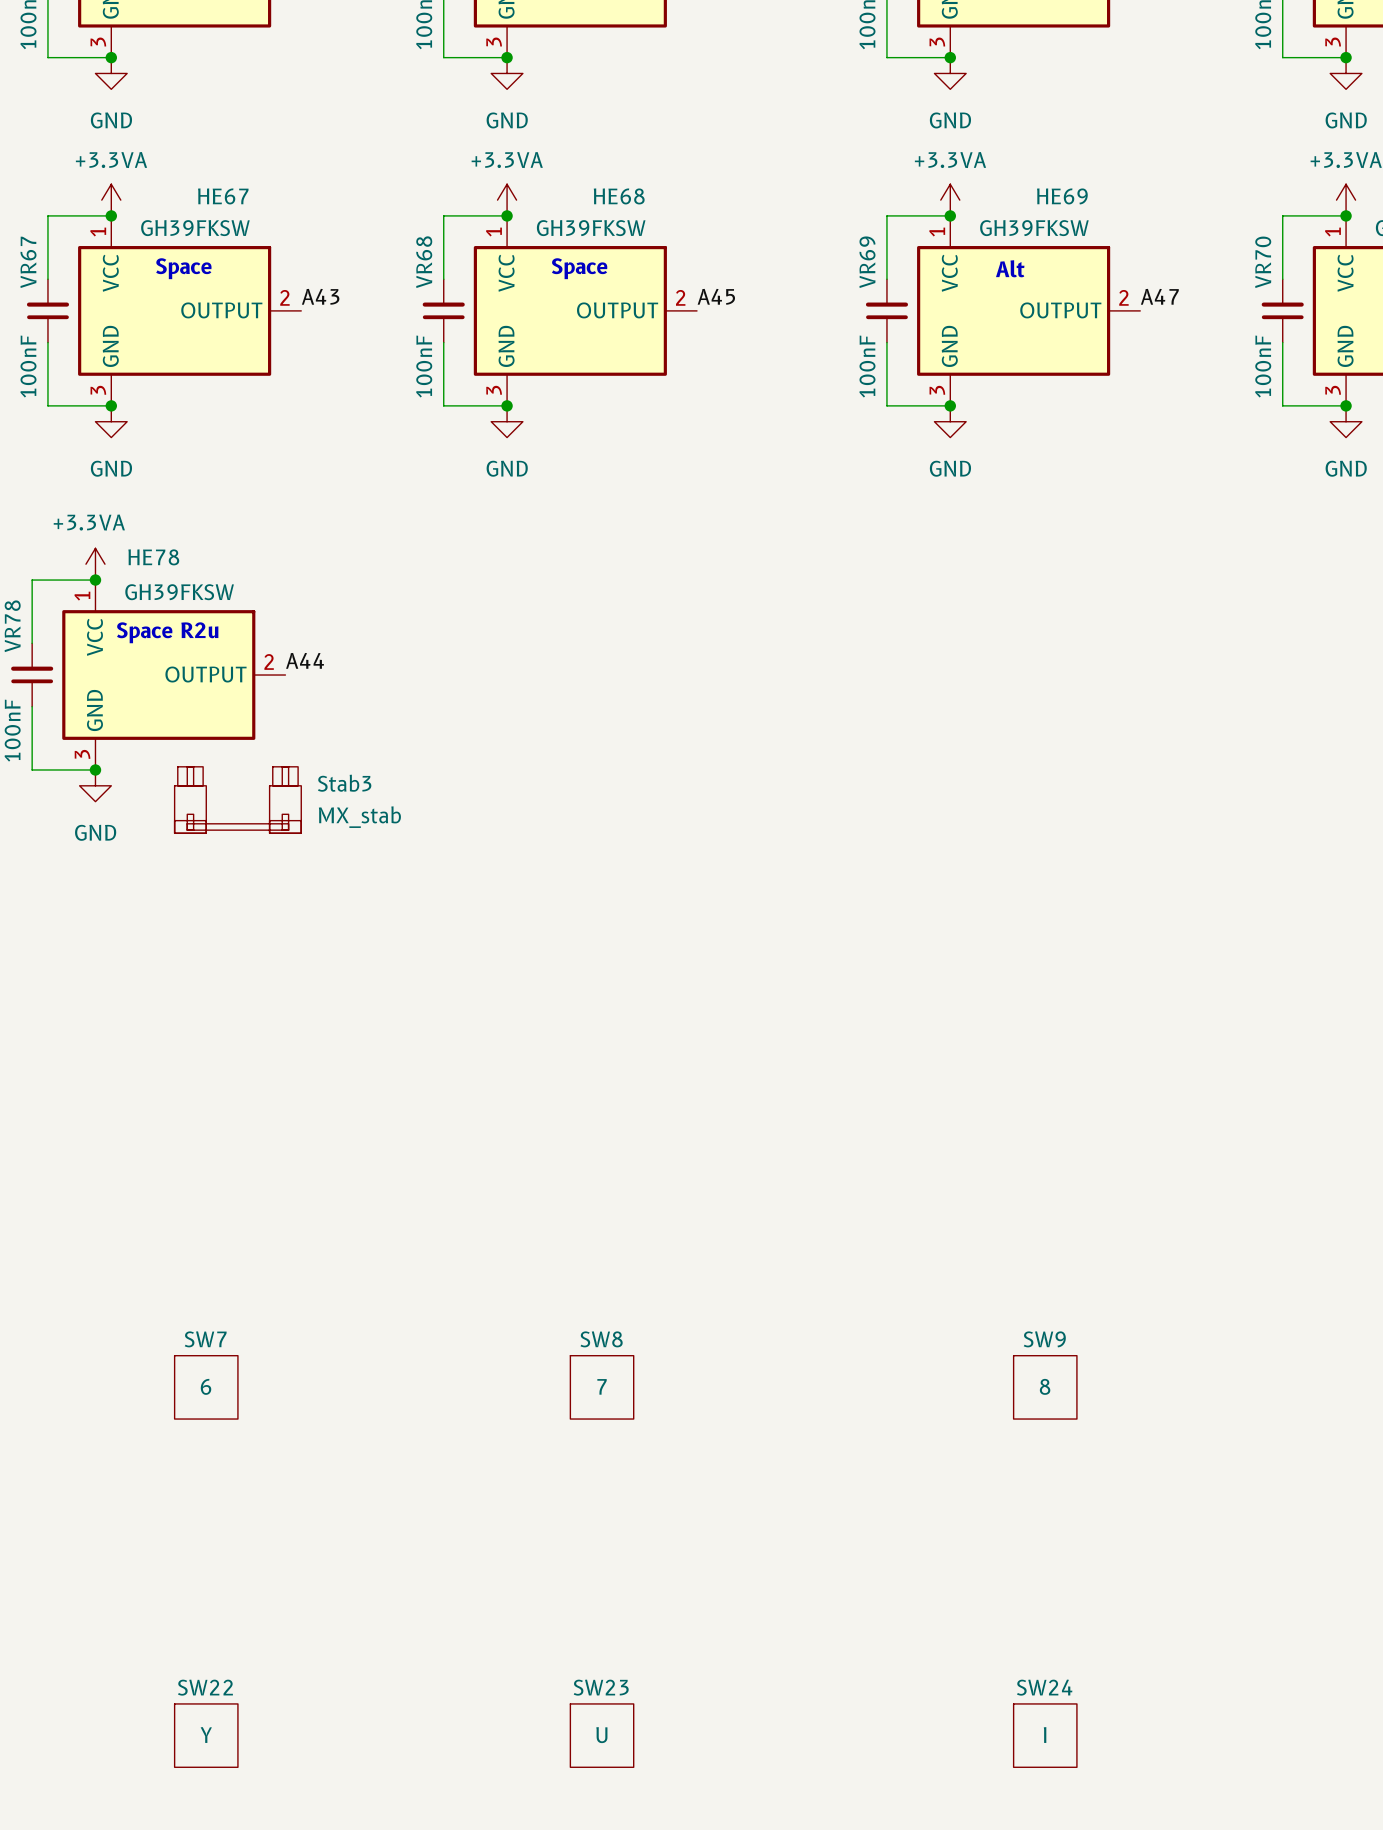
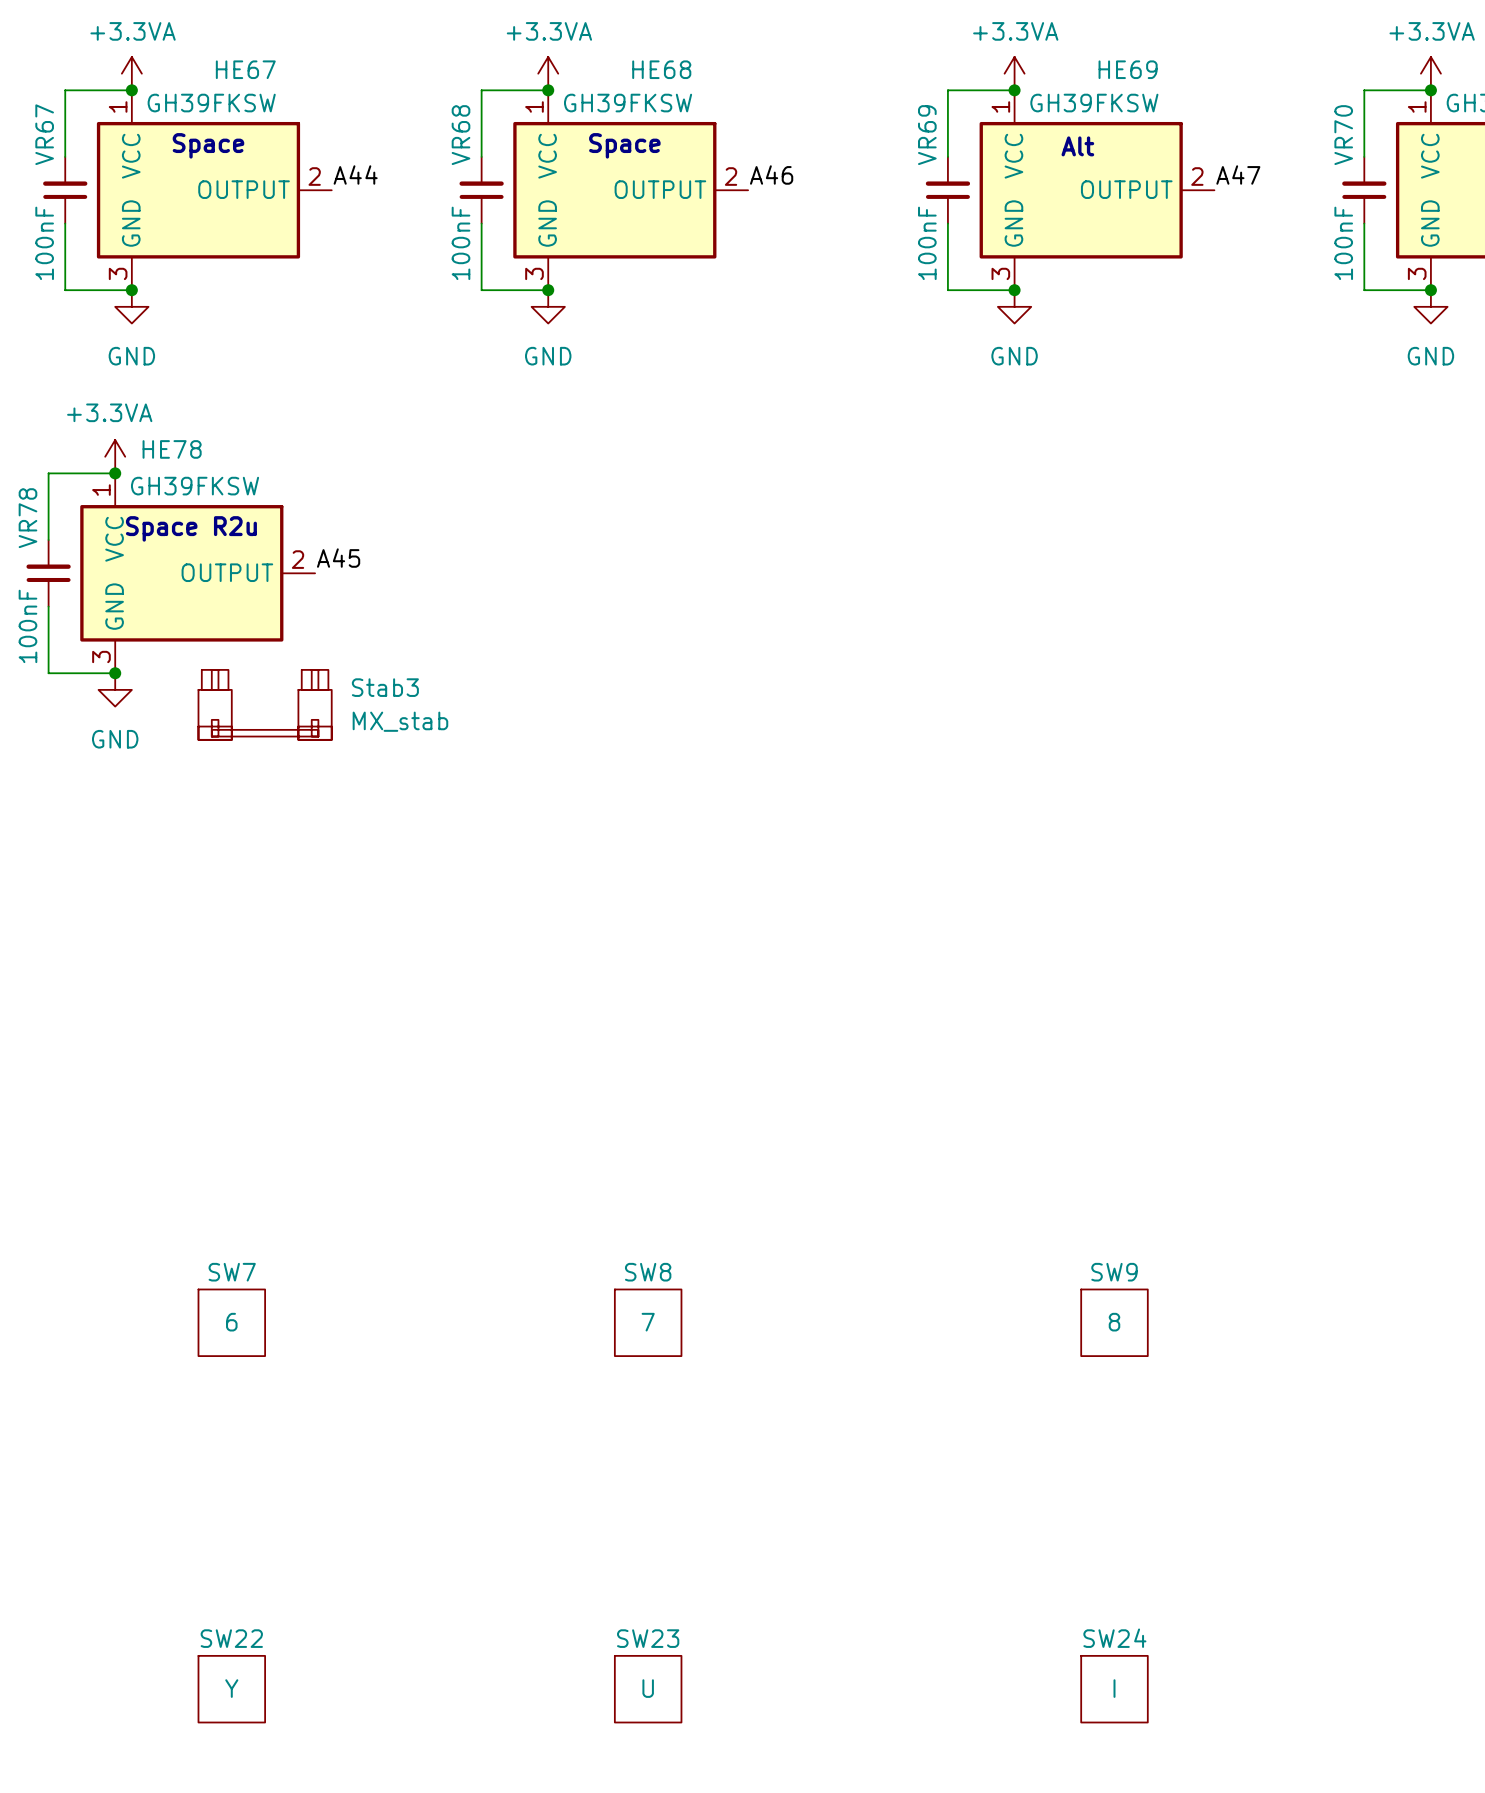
label: A43 (320, 296) -> A44 (355, 175)
label: A45 (716, 296) -> A46 (771, 175)
label: A44 (305, 660) -> A45 (338, 558)

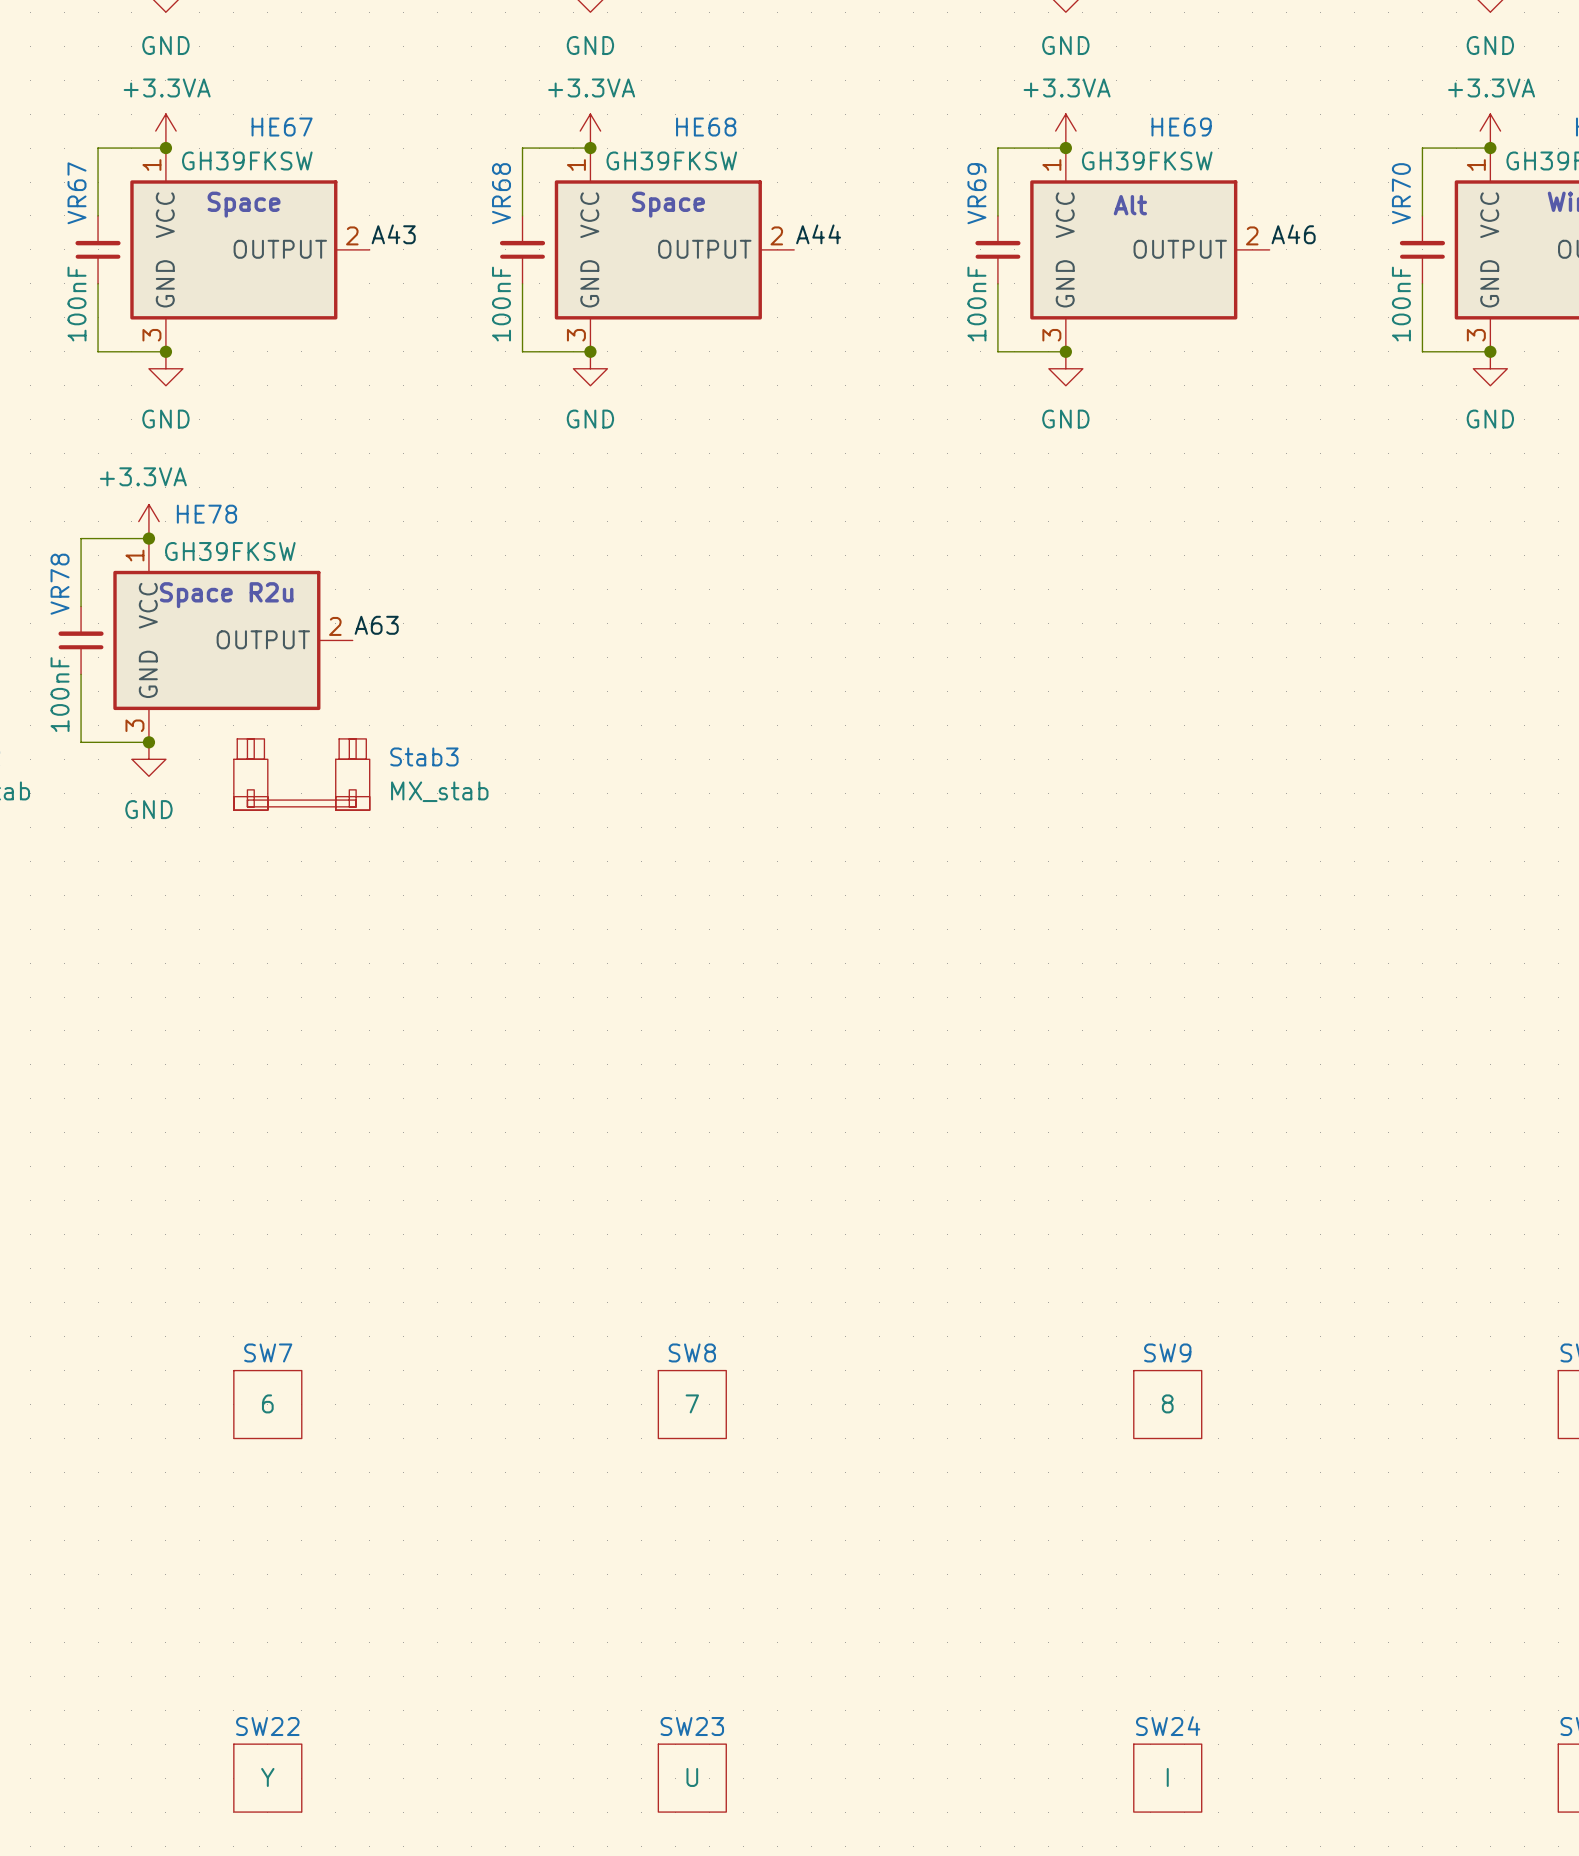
label: A44 (355, 175) -> A43 (393, 234)
label: A46 (771, 175) -> A44 (818, 234)
label: A47 (1238, 175) -> A46 (1293, 234)
label: A45 (338, 558) -> A63 (376, 625)

